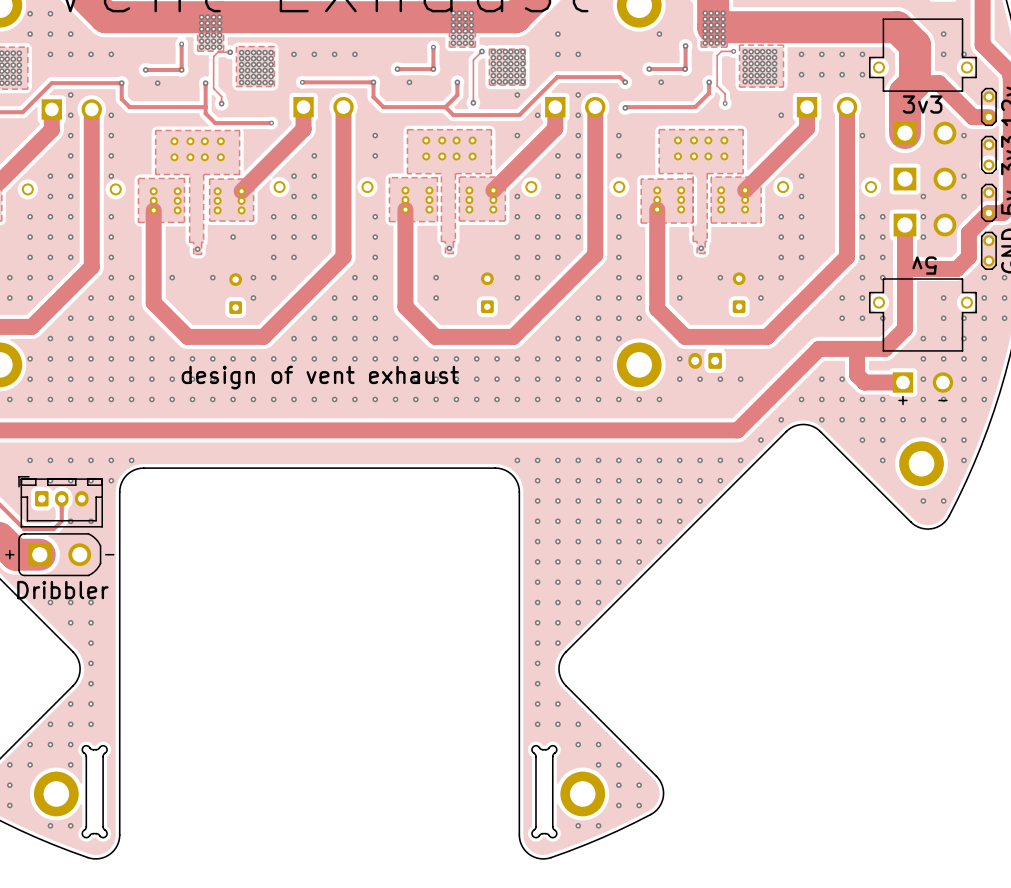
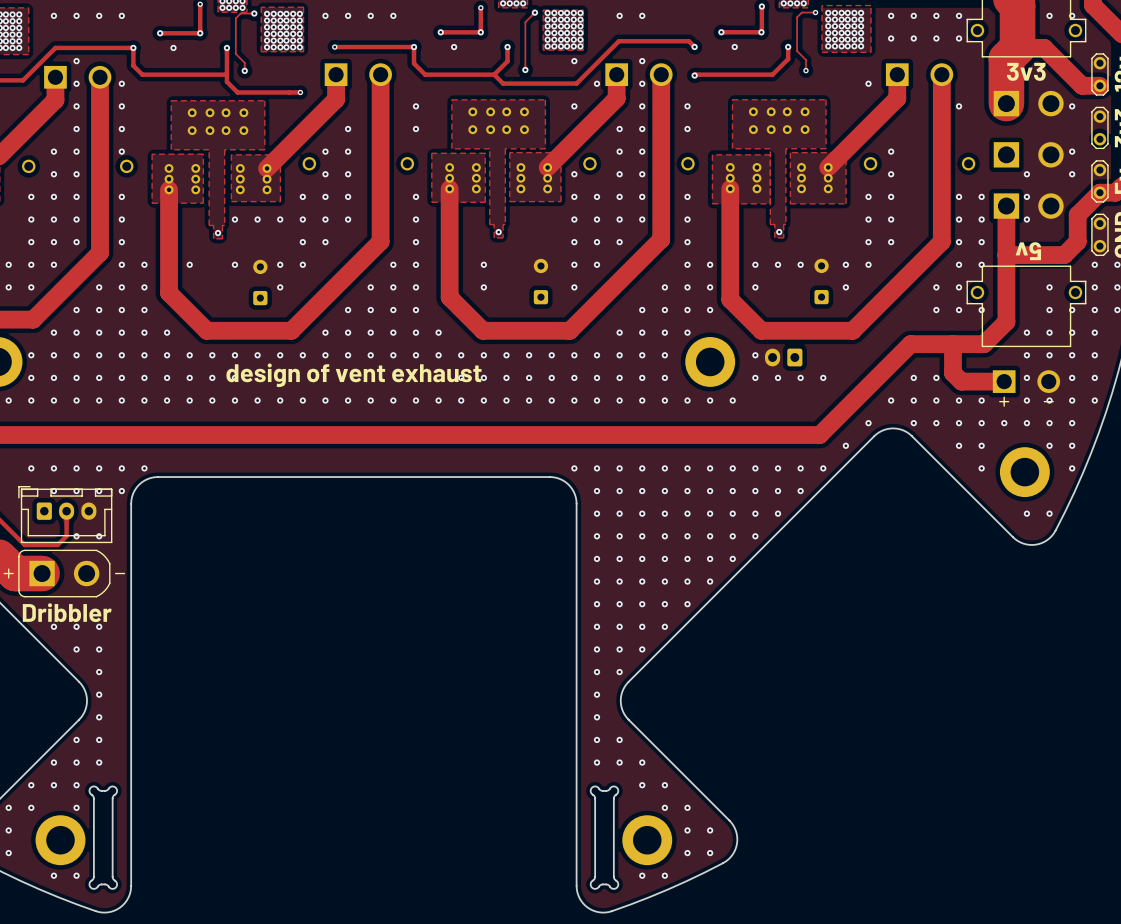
via: none -> (234, 219)
via: none -> (280, 219)
via: none -> (778, 264)

